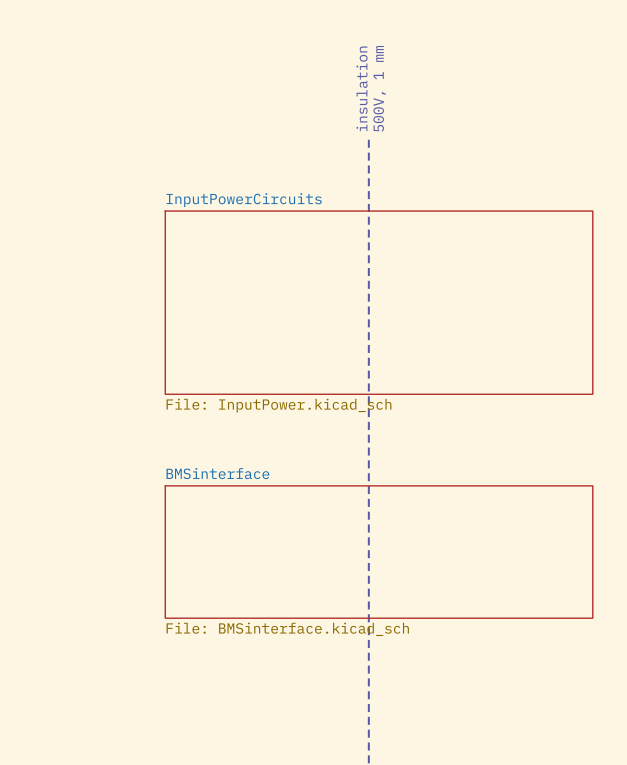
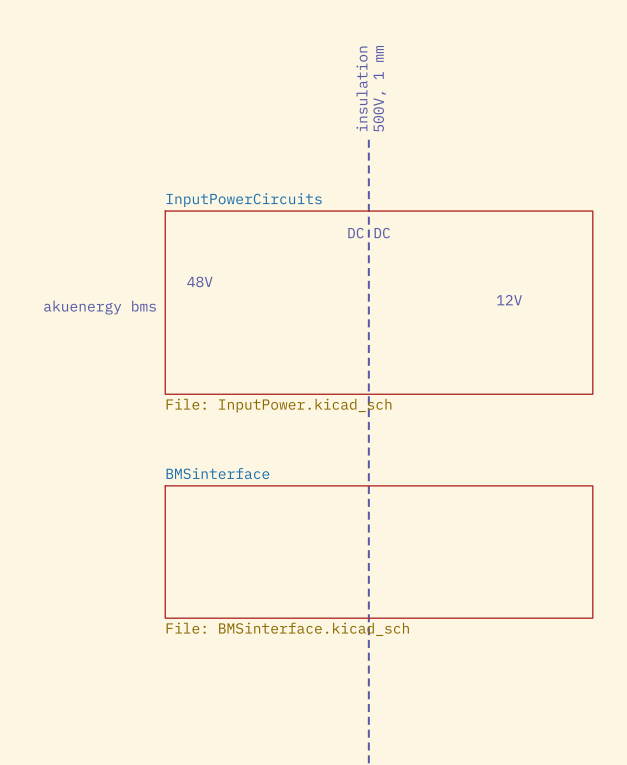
text: none -> DC DC (369, 233)
text: none -> 48V (199, 281)
text: none -> 12V (509, 300)
text: none -> akuenergy bms (100, 307)

